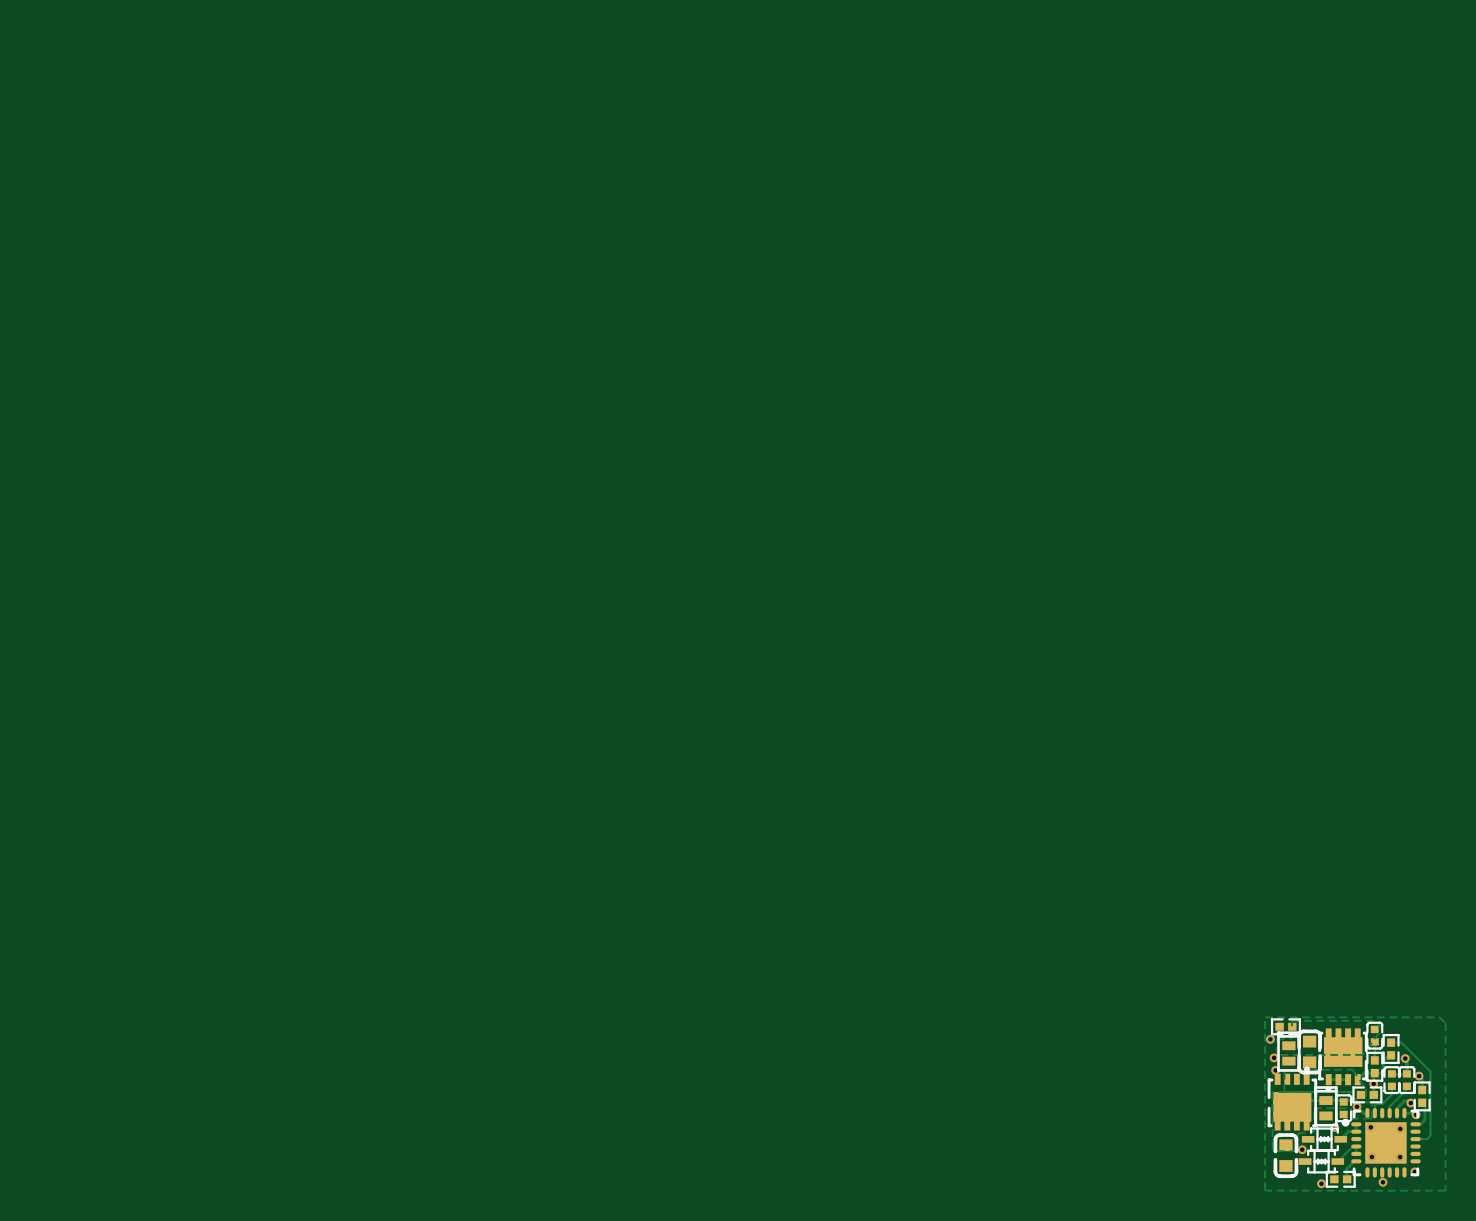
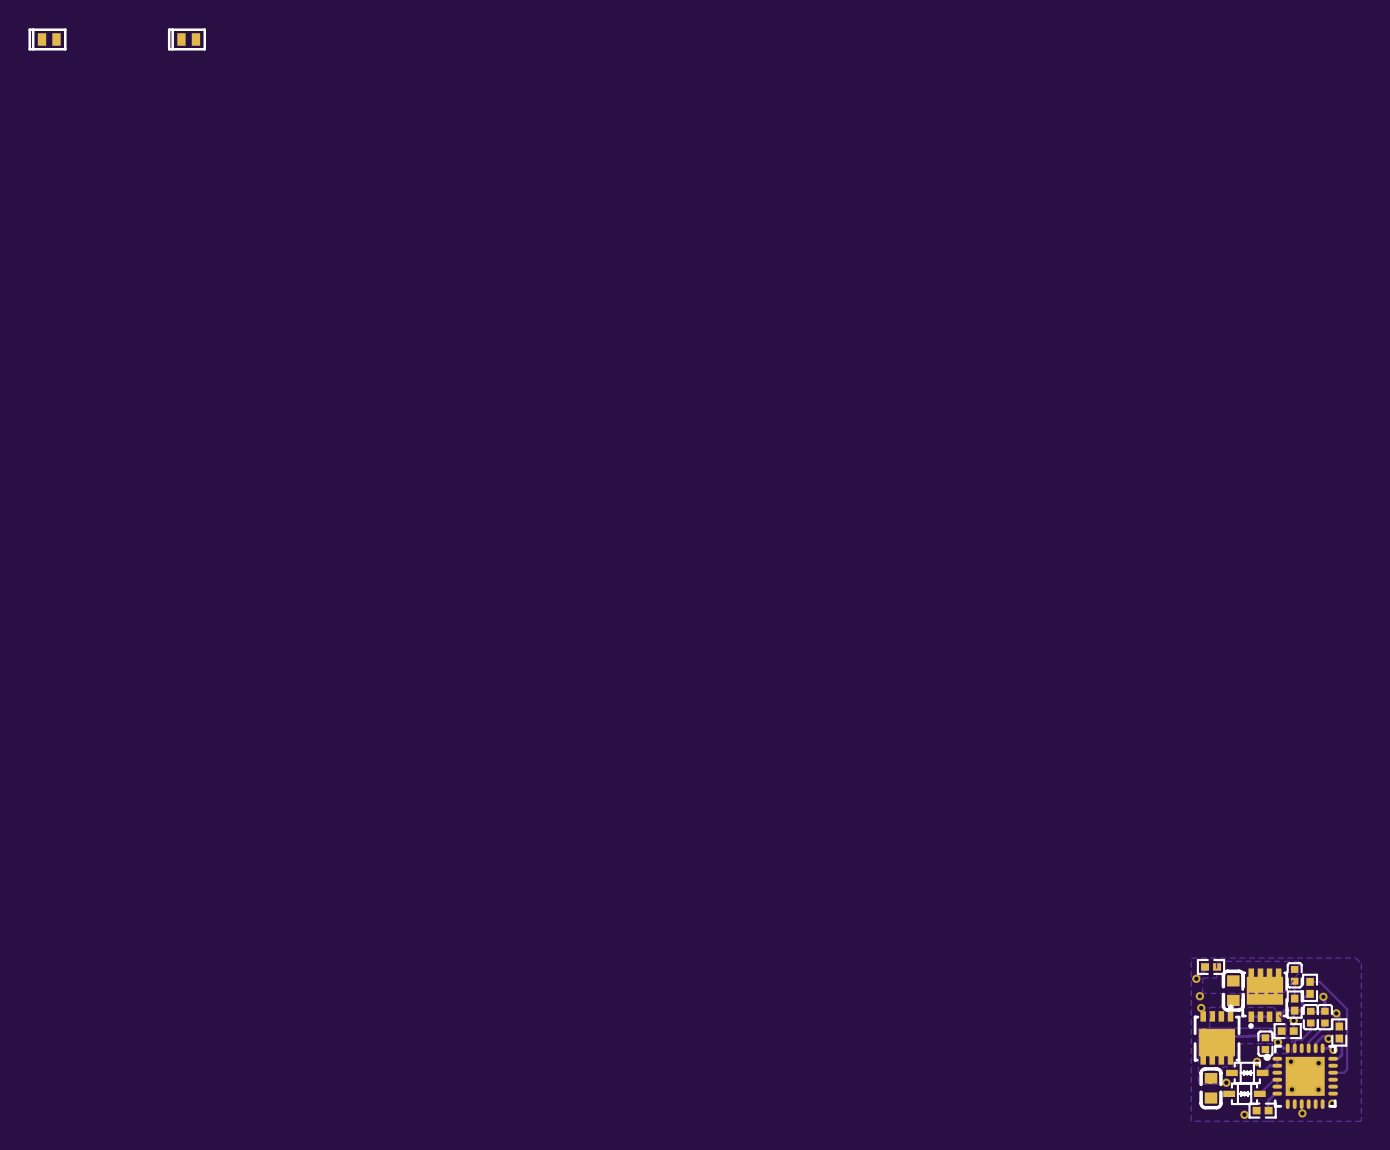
part: none -> (47, 39)
part: none -> (186, 39)
part: (1288, 1051) -> none
part: (1325, 1106) -> none

